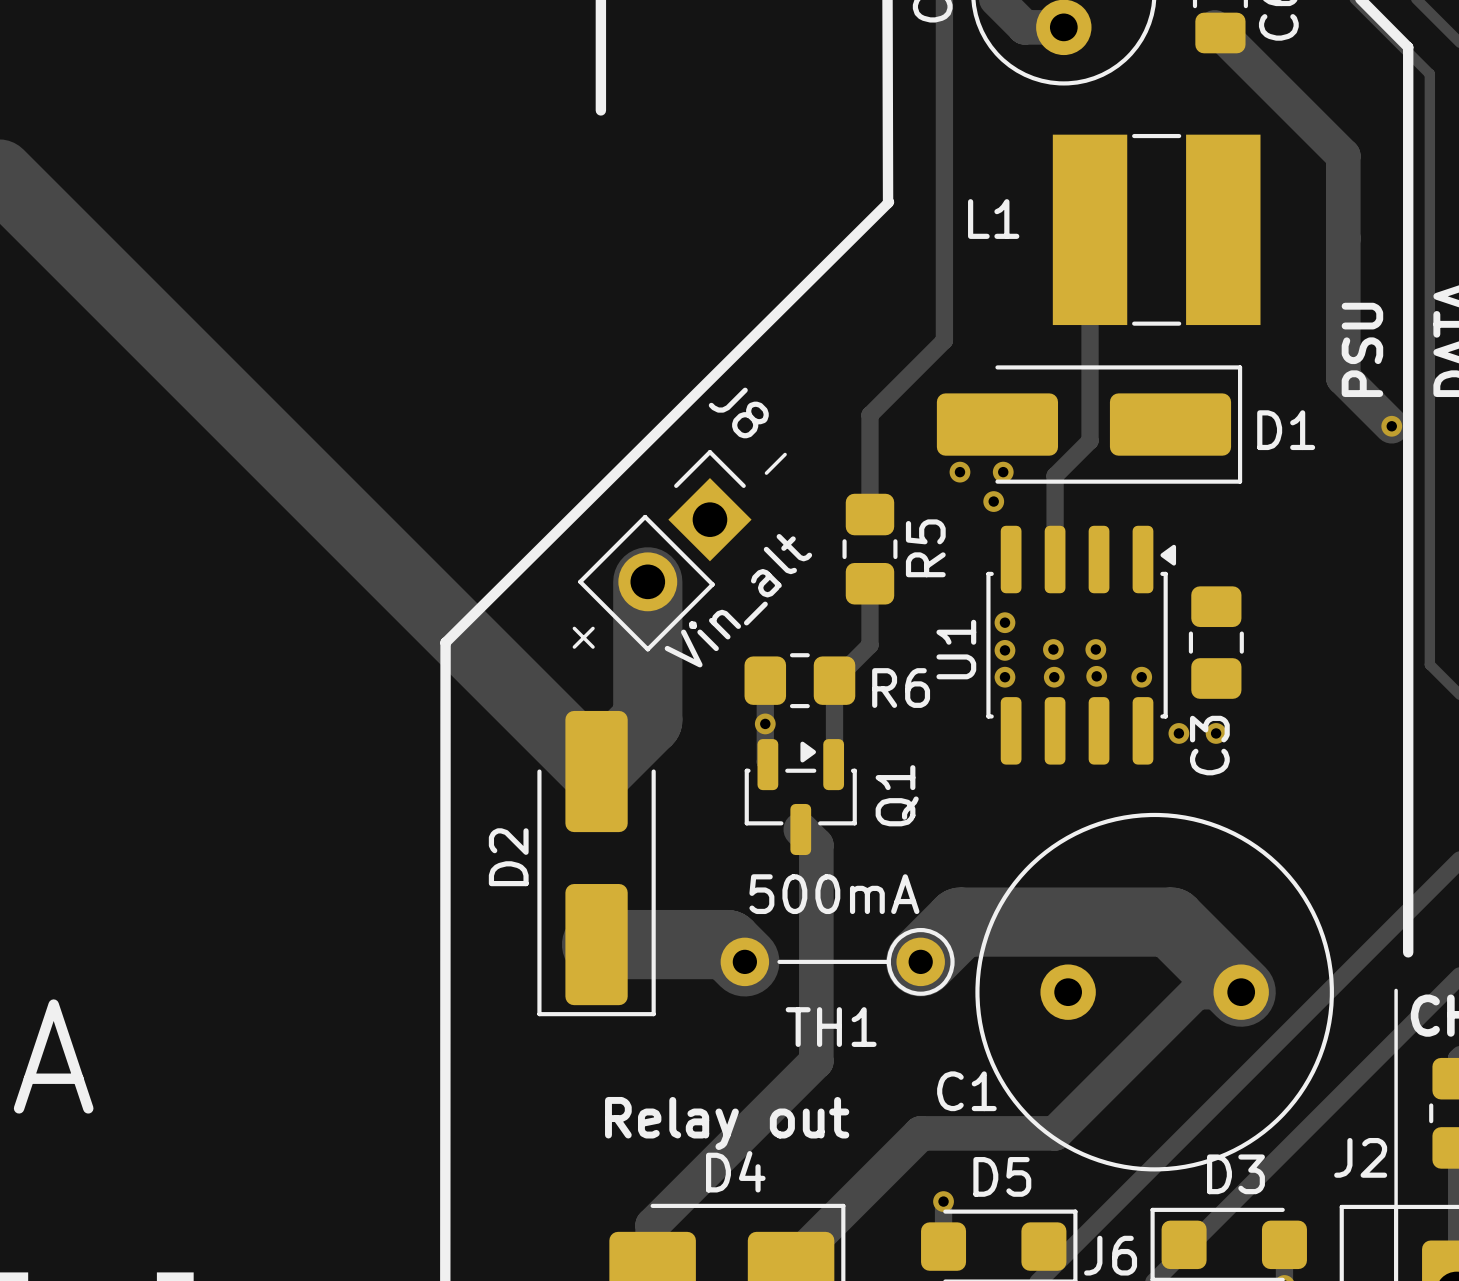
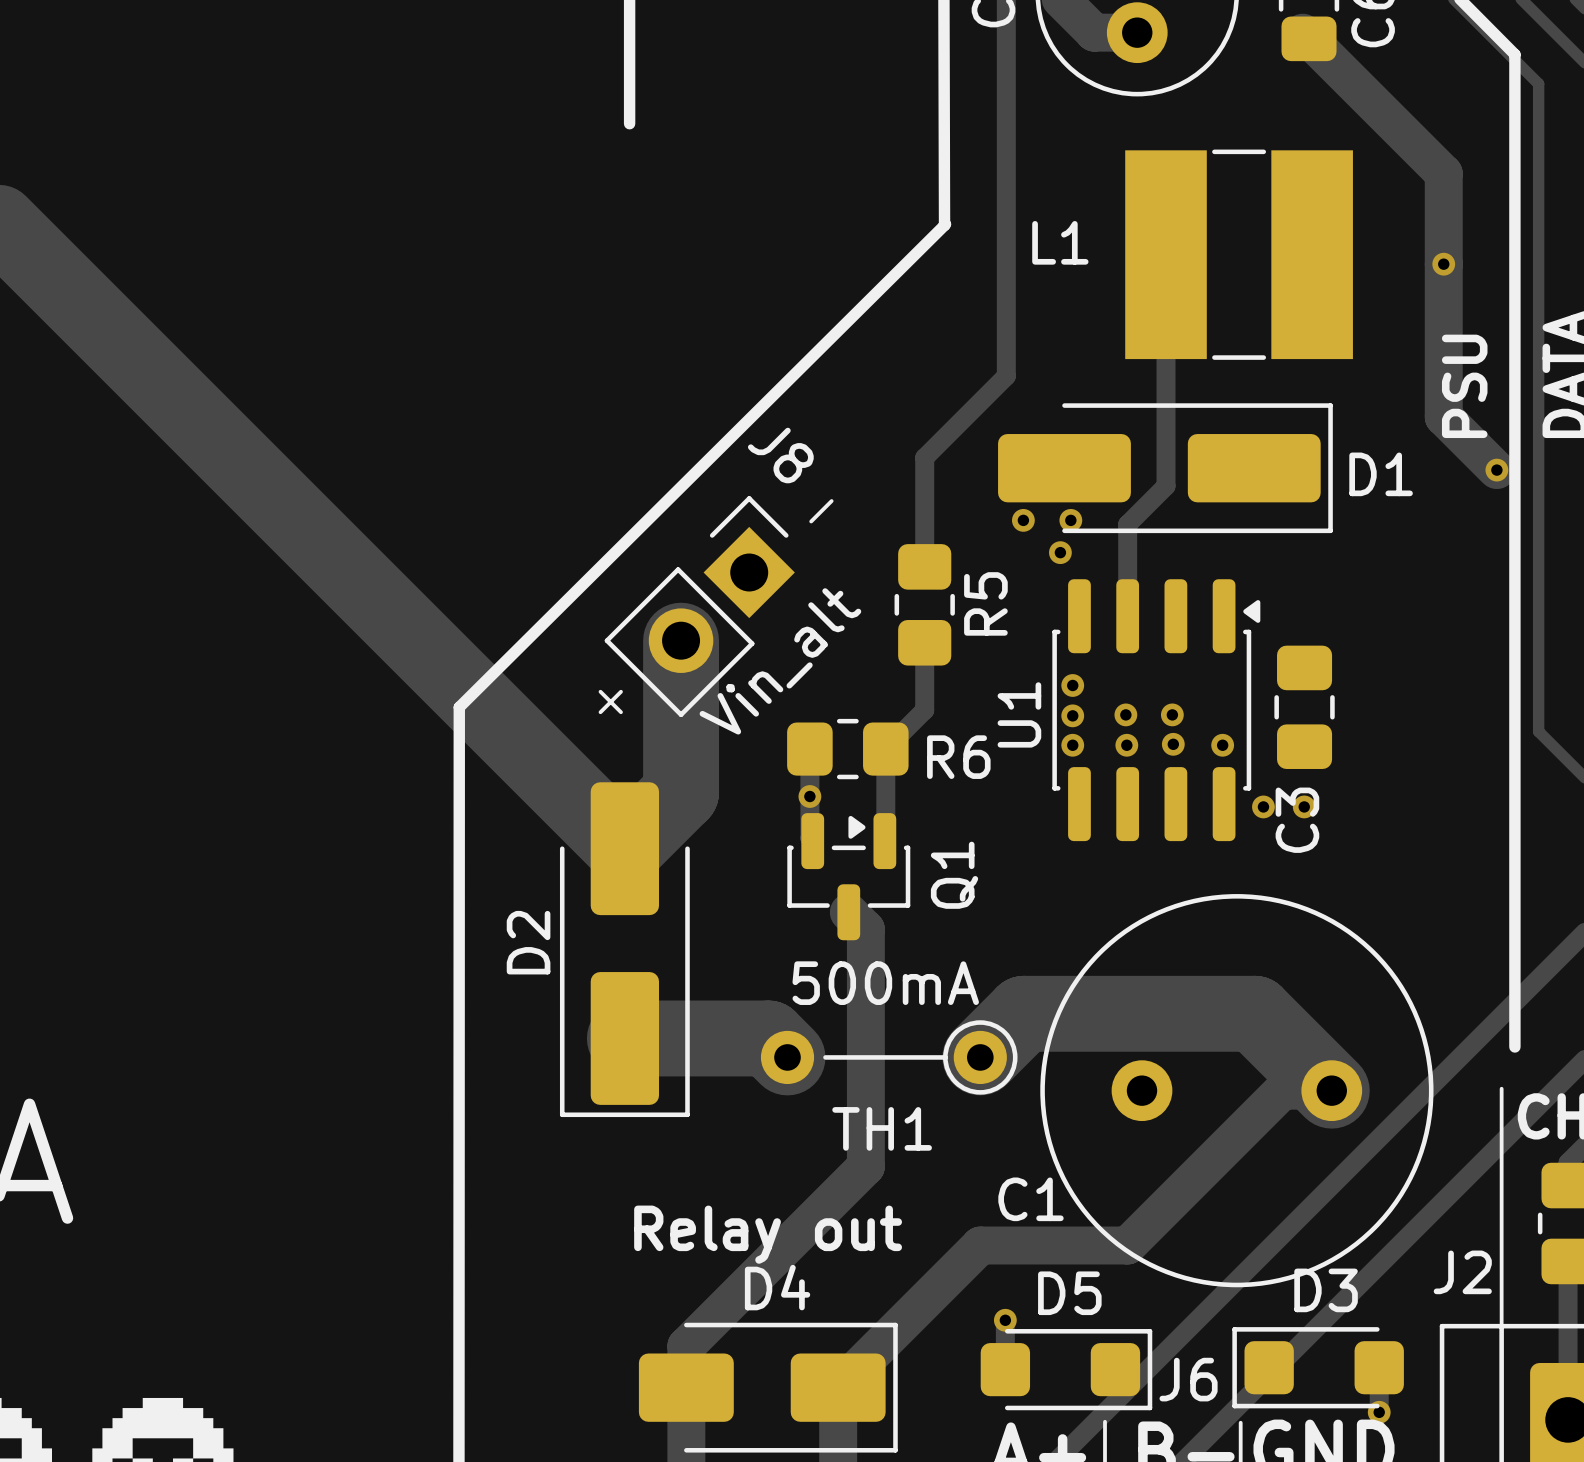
via: none -> (1443, 264)

